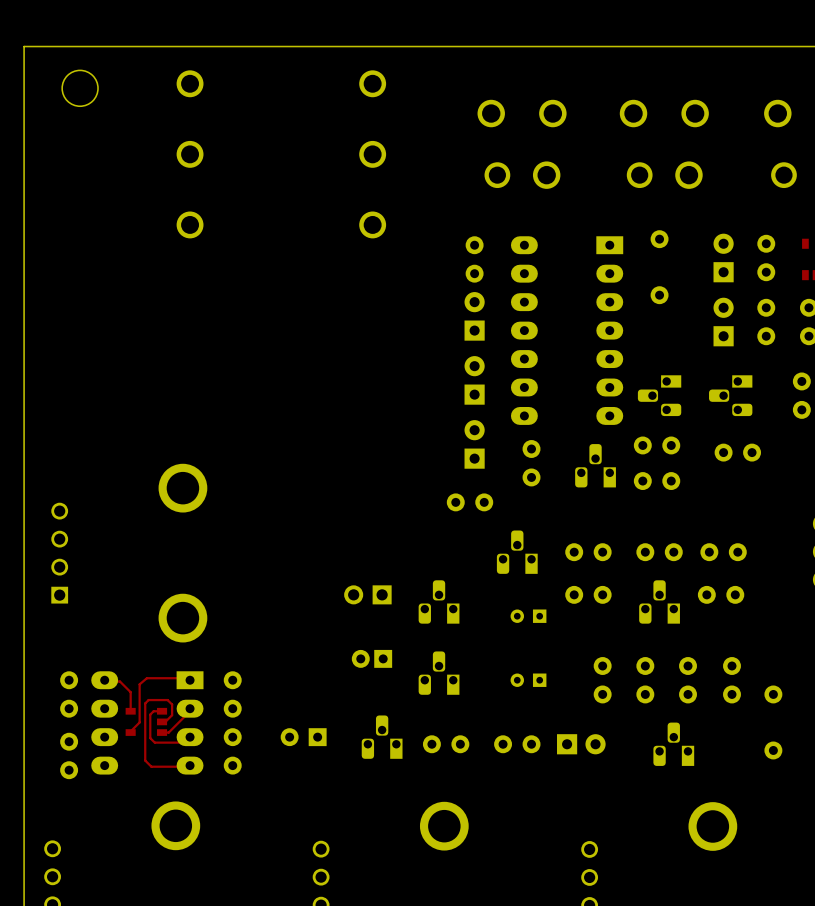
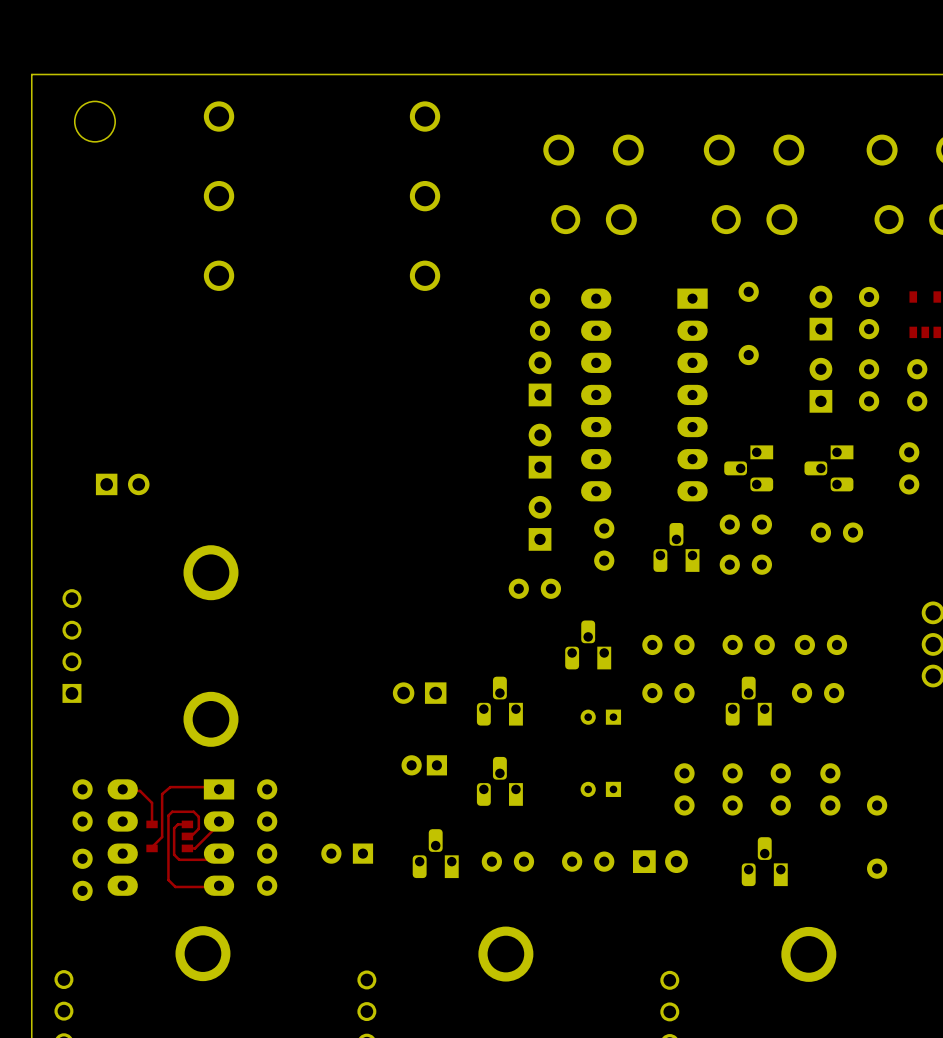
part: none -> (122, 484)

